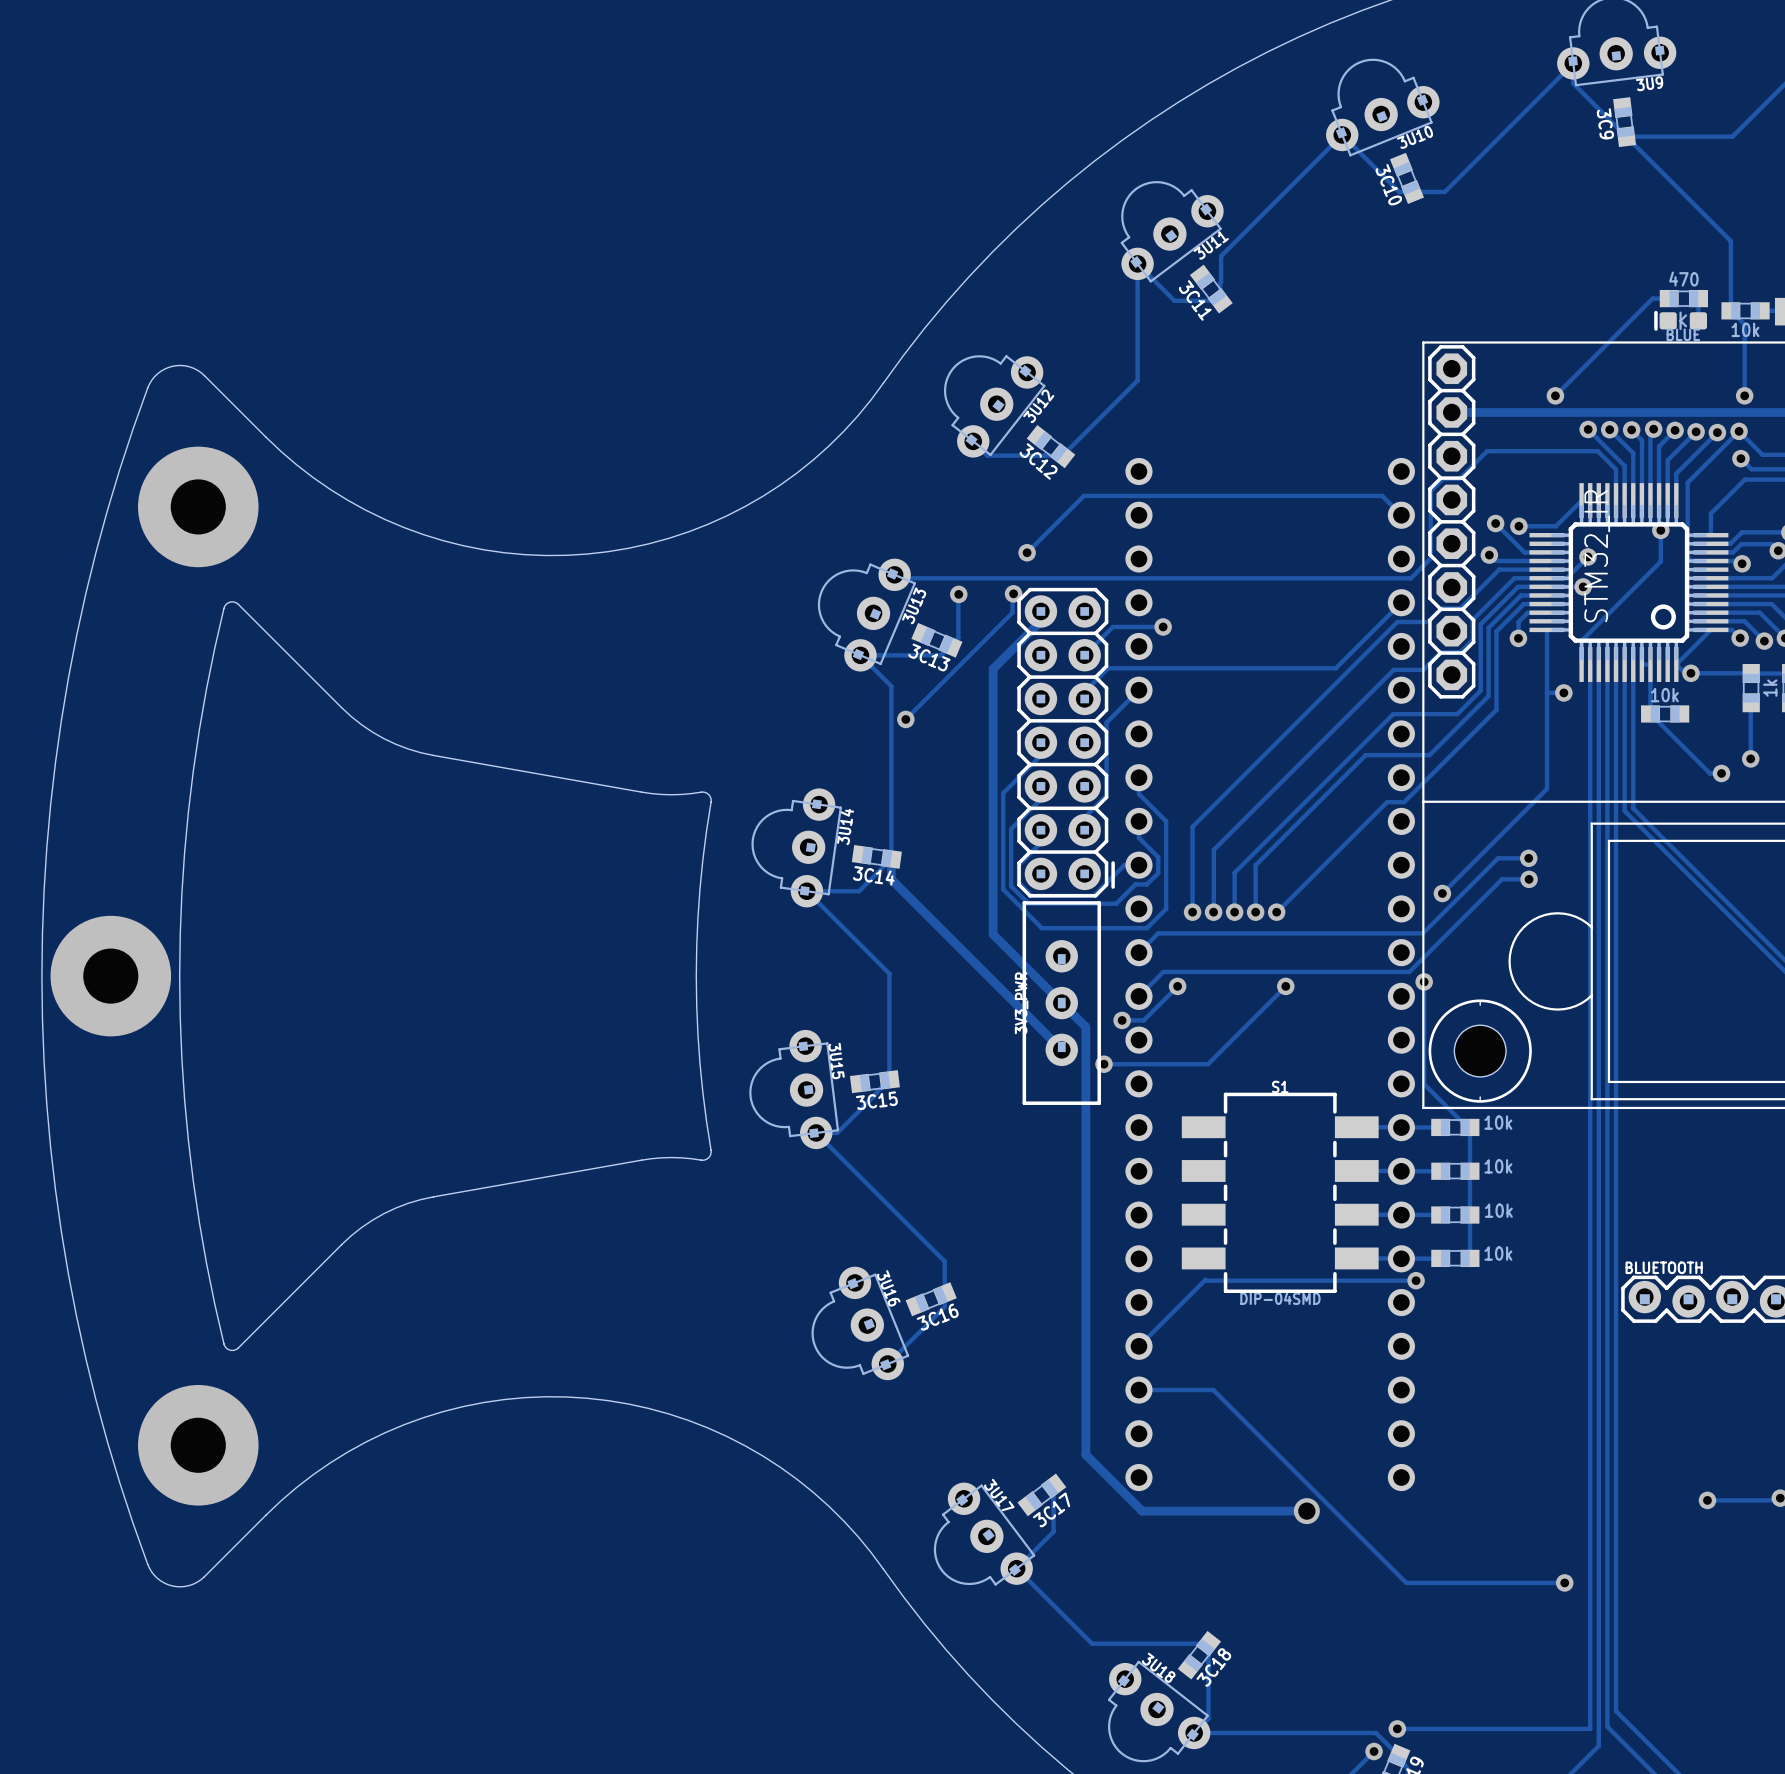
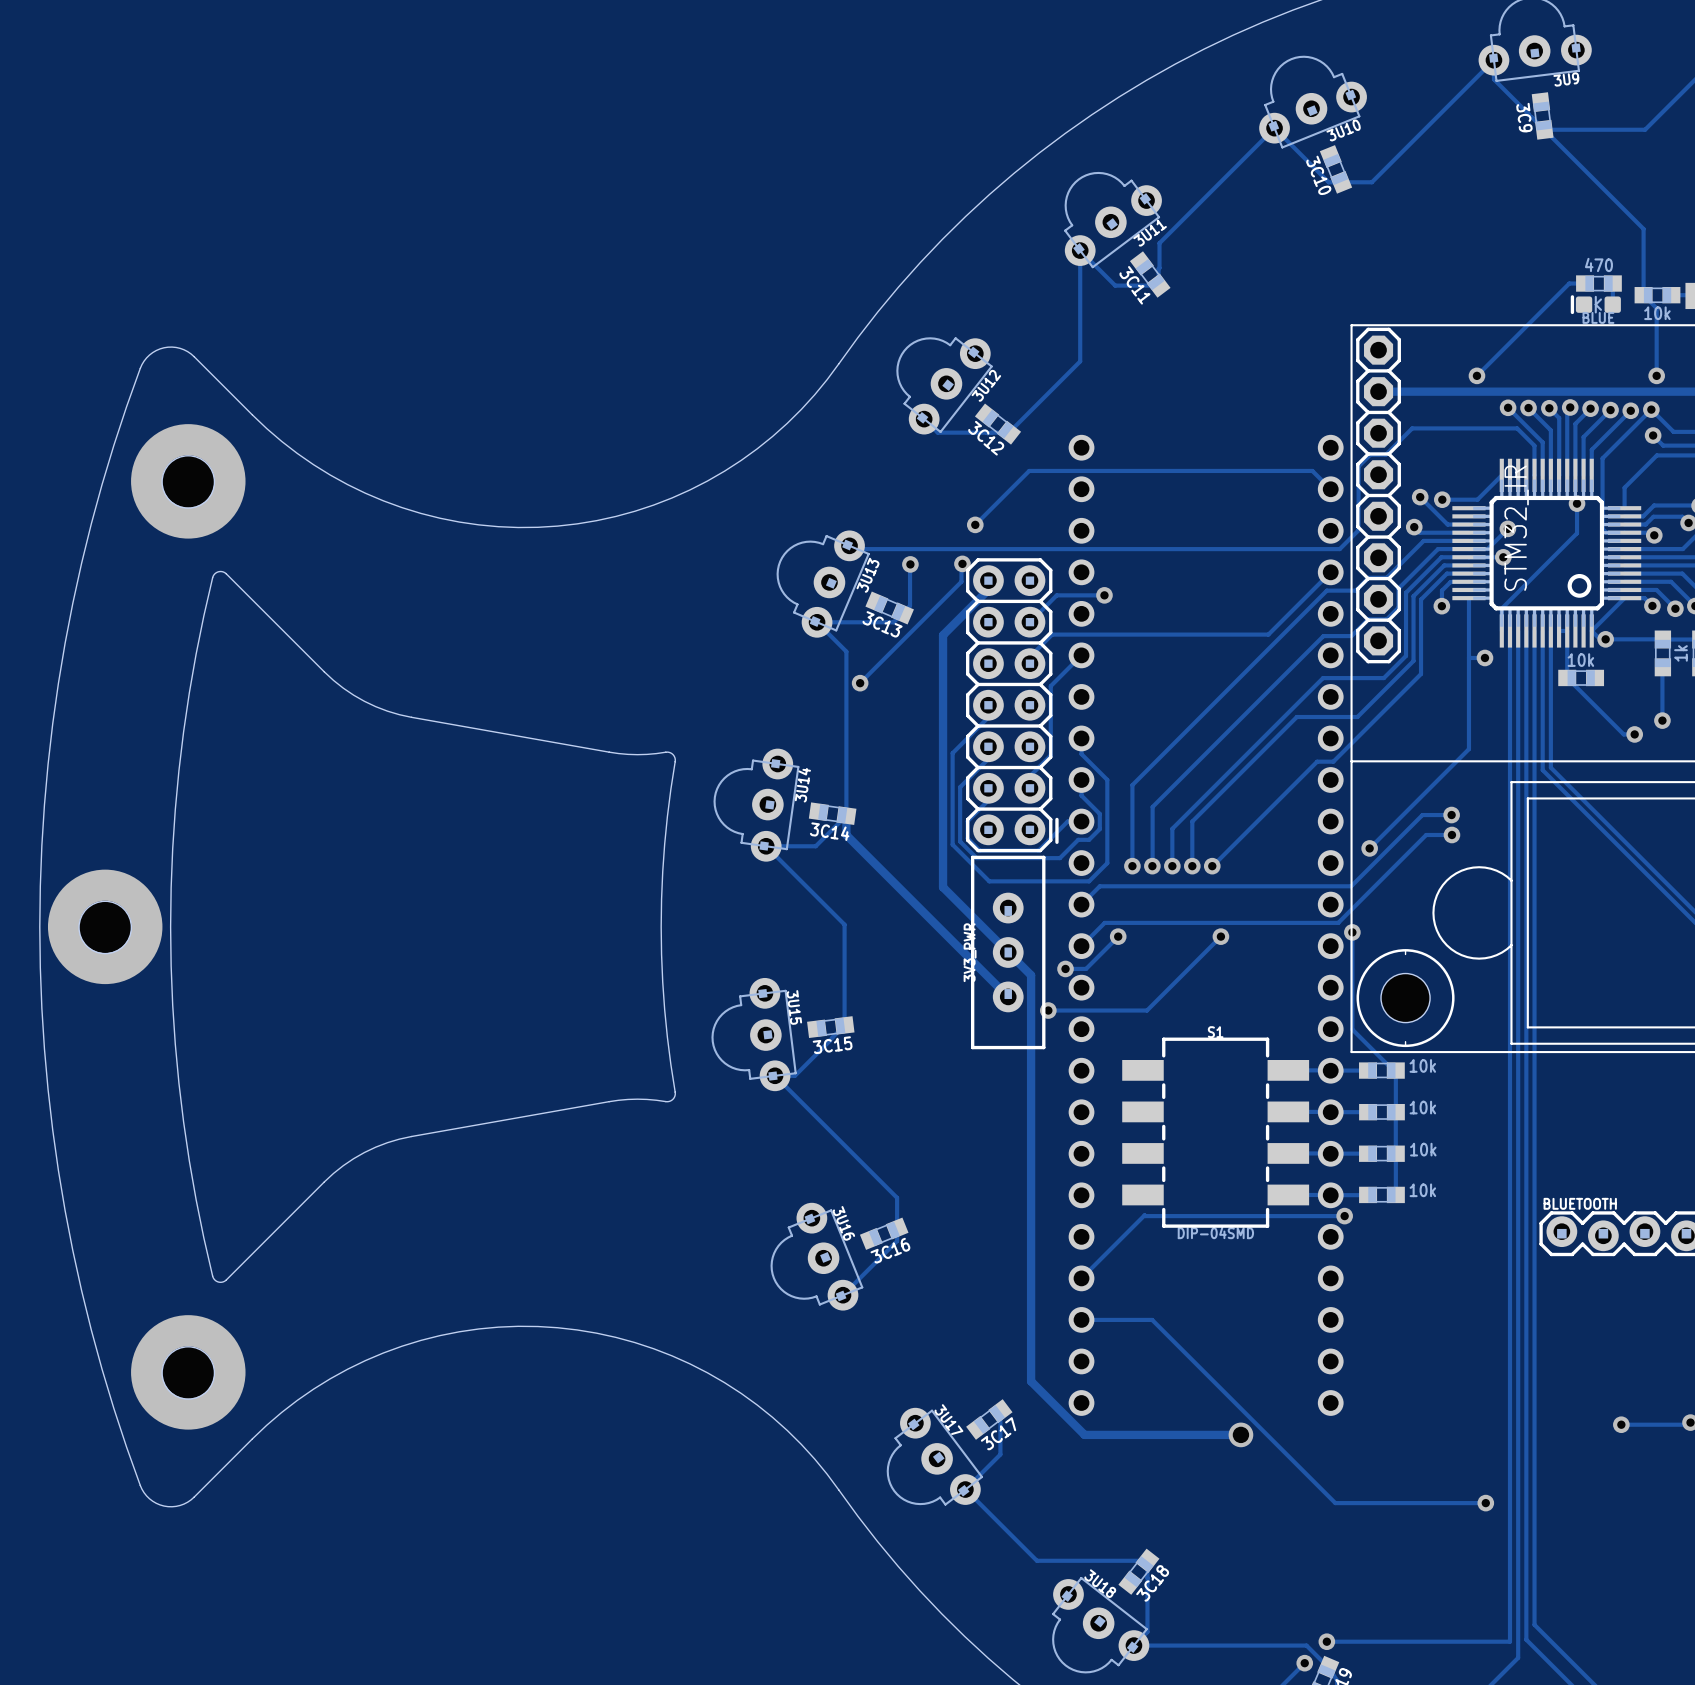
round board edge: none -> [162, 455, 215, 509]
round board edge: none -> [79, 901, 132, 954]
round board edge: none -> [162, 1346, 215, 1400]

